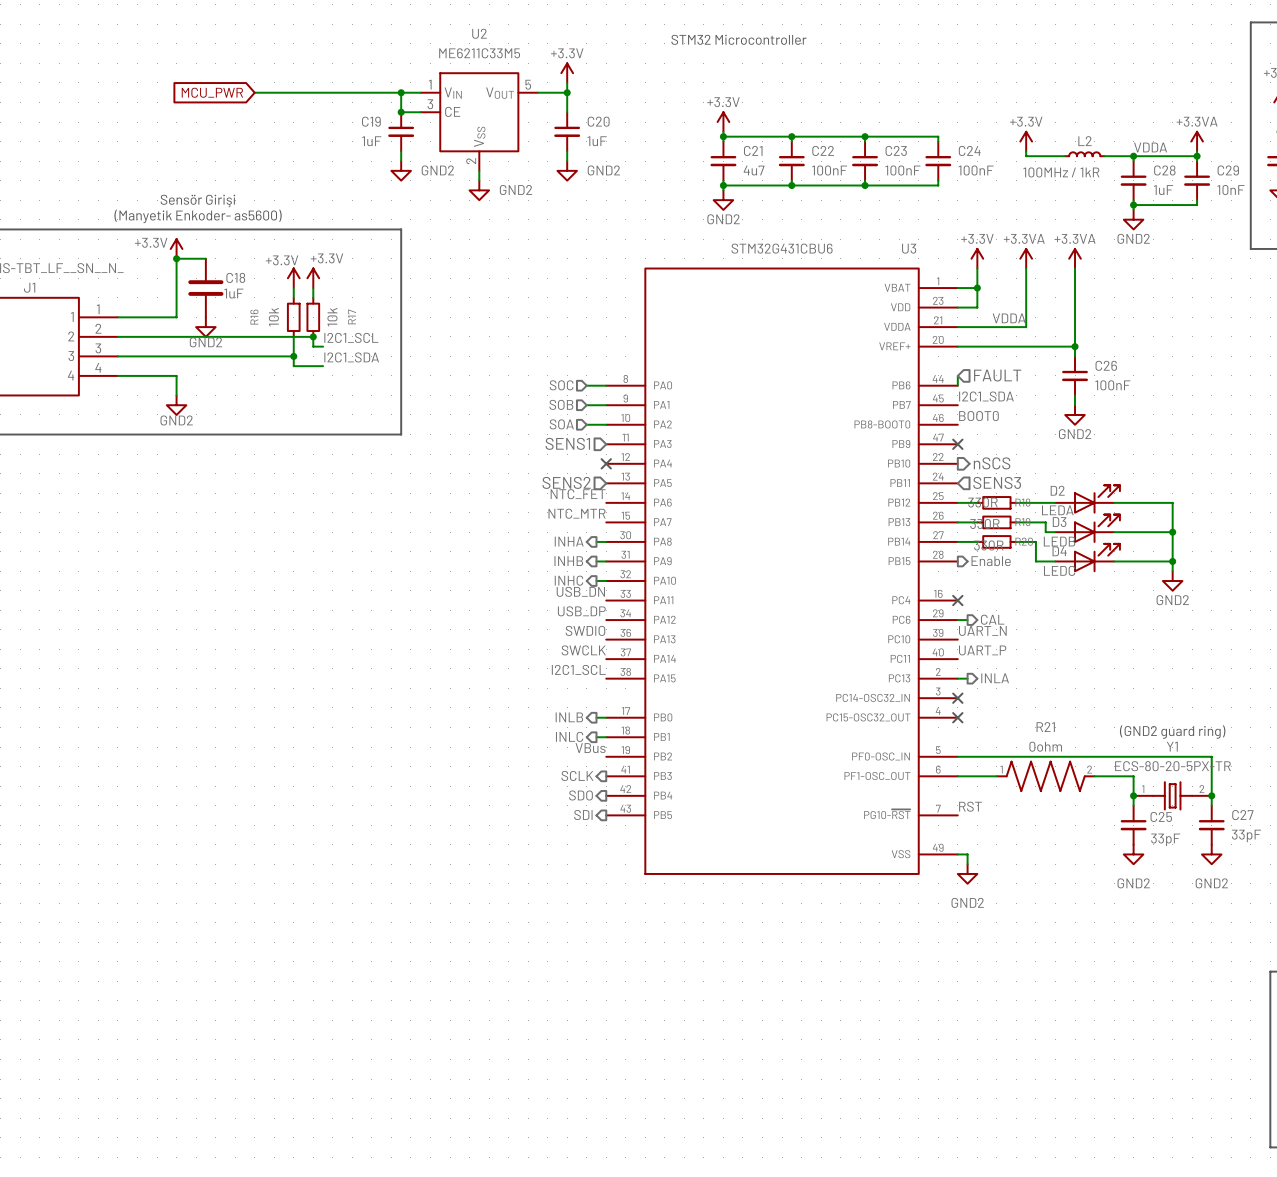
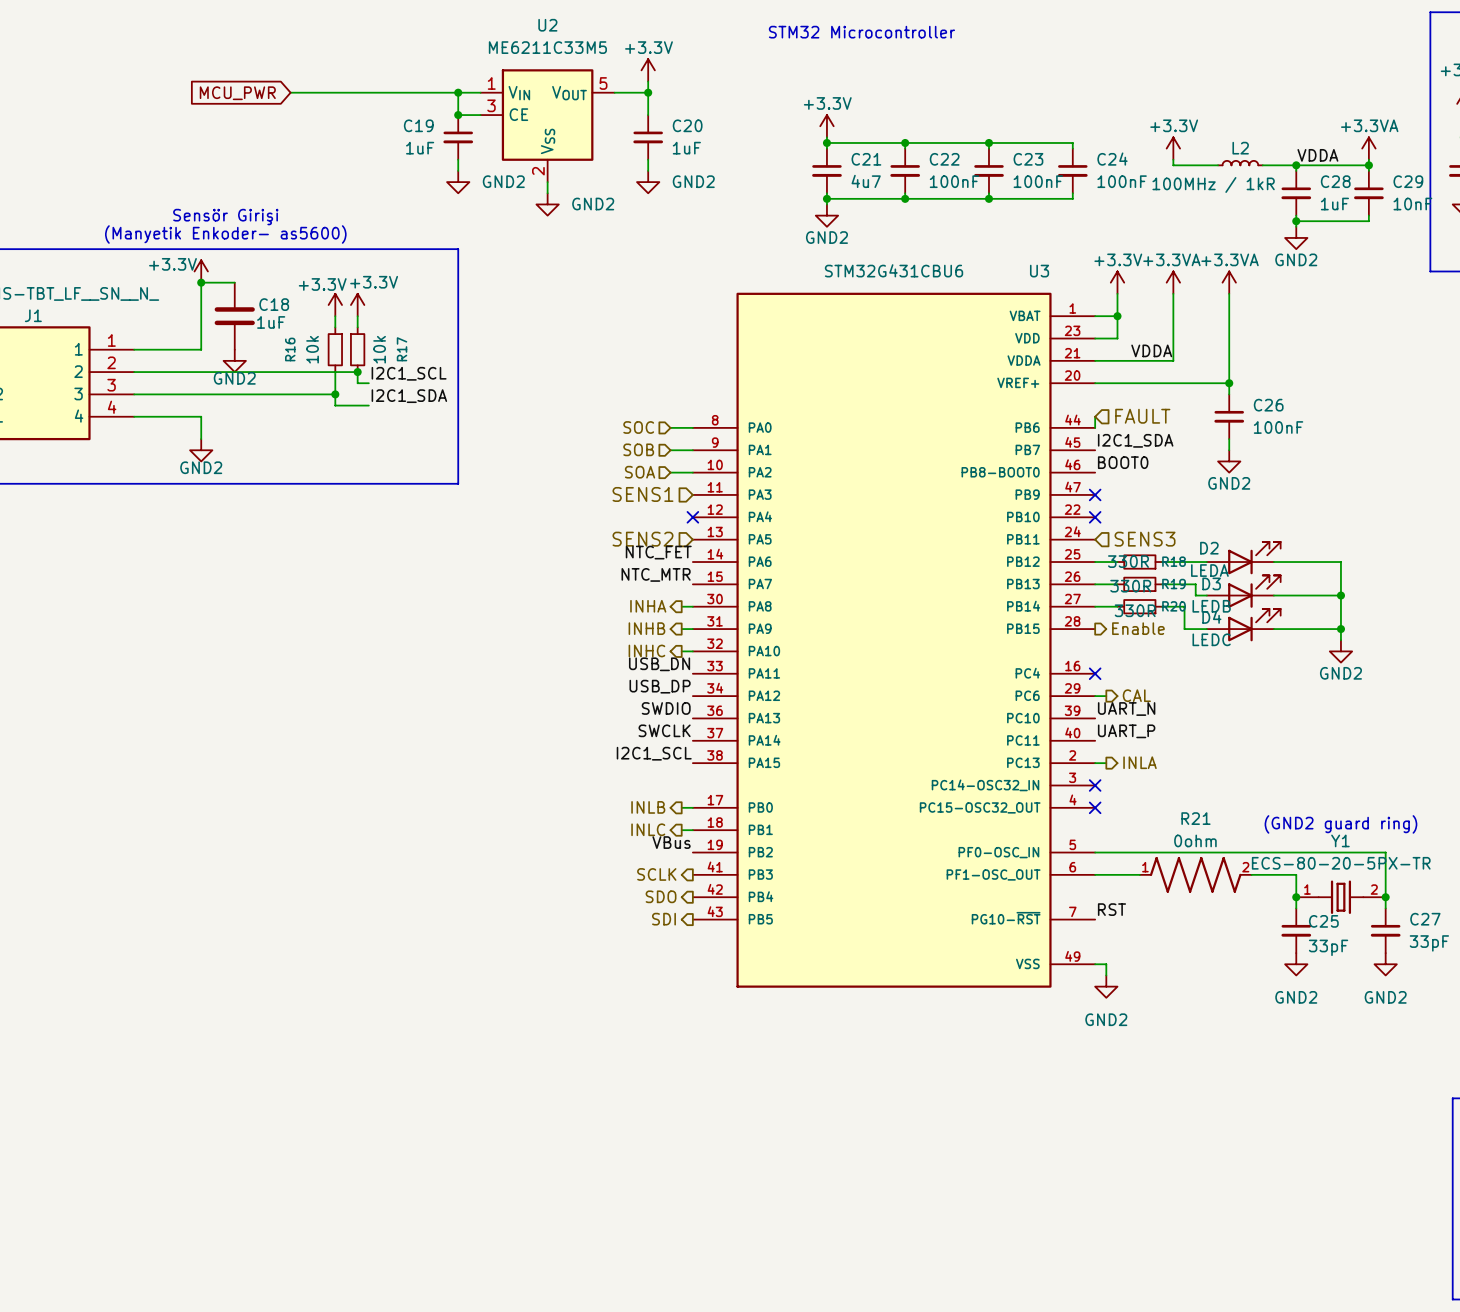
no-connect mark: none -> (1095, 517)
hierarchical label: nSCS (992, 463) -> none

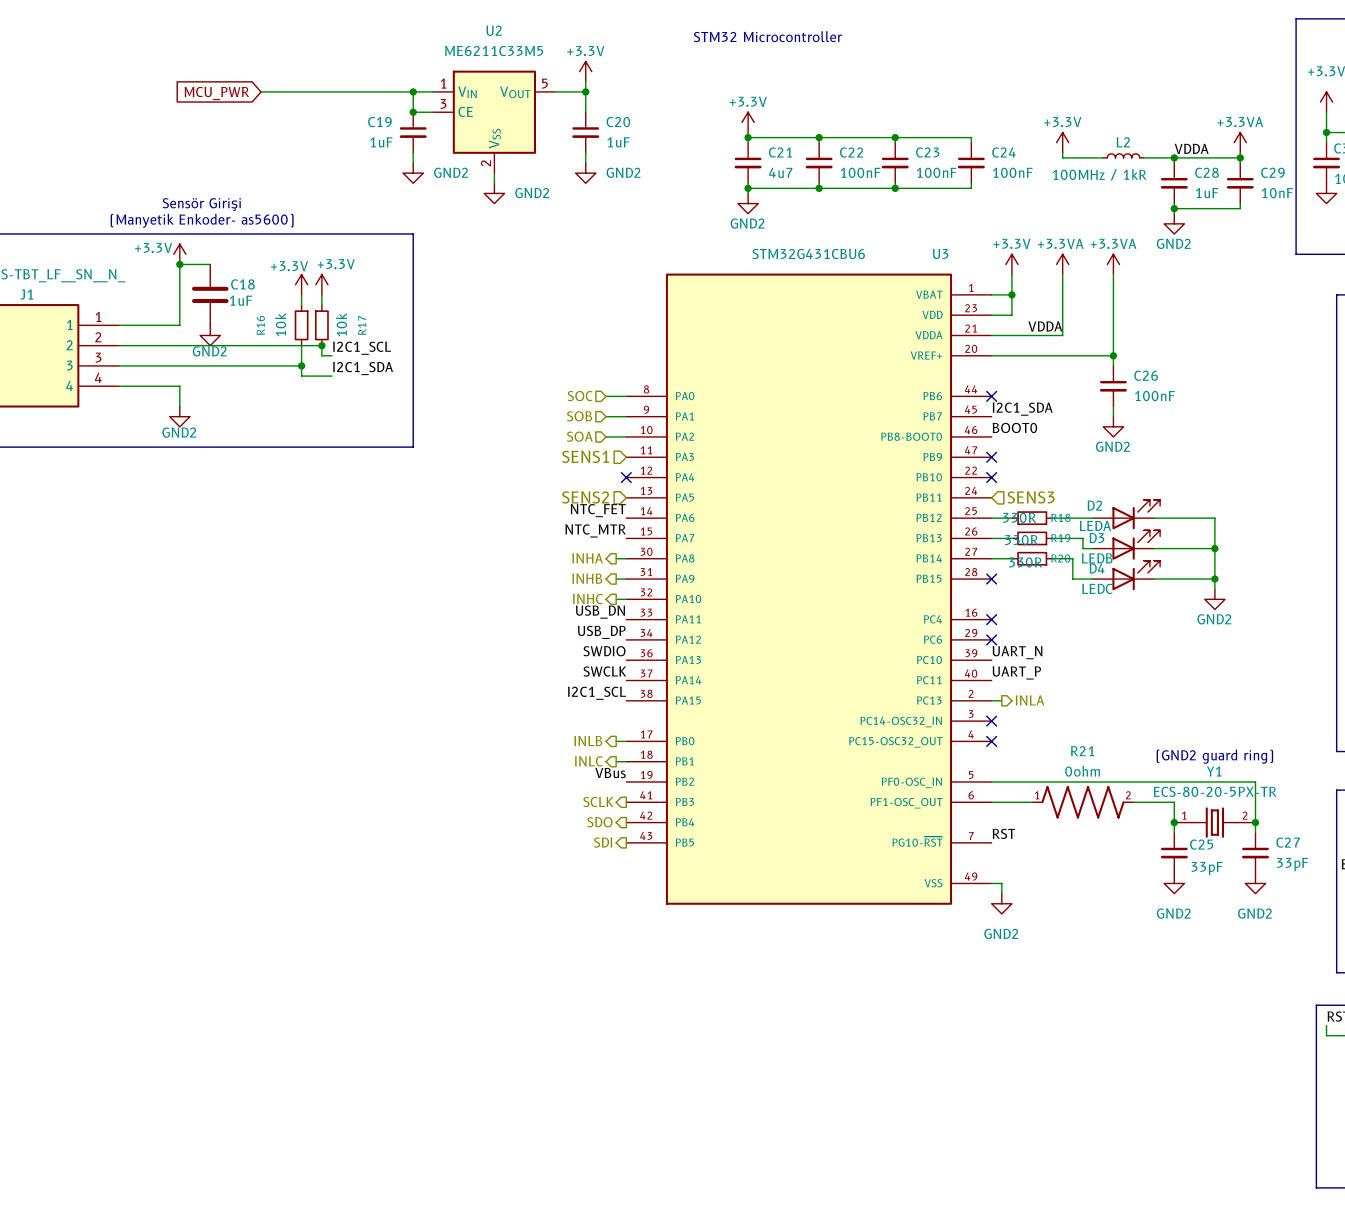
wire: (1095, 416) (1095, 427) -> none
hierarchical label: FAULT (1142, 416) -> none
no-connect mark: none -> (991, 396)
hierarchical label: Enable (1138, 628) -> none
no-connect mark: none -> (991, 579)
hierarchical label: CAL (1136, 695) -> none
wire: (1095, 696) (1106, 696) -> none
no-connect mark: none -> (991, 639)

